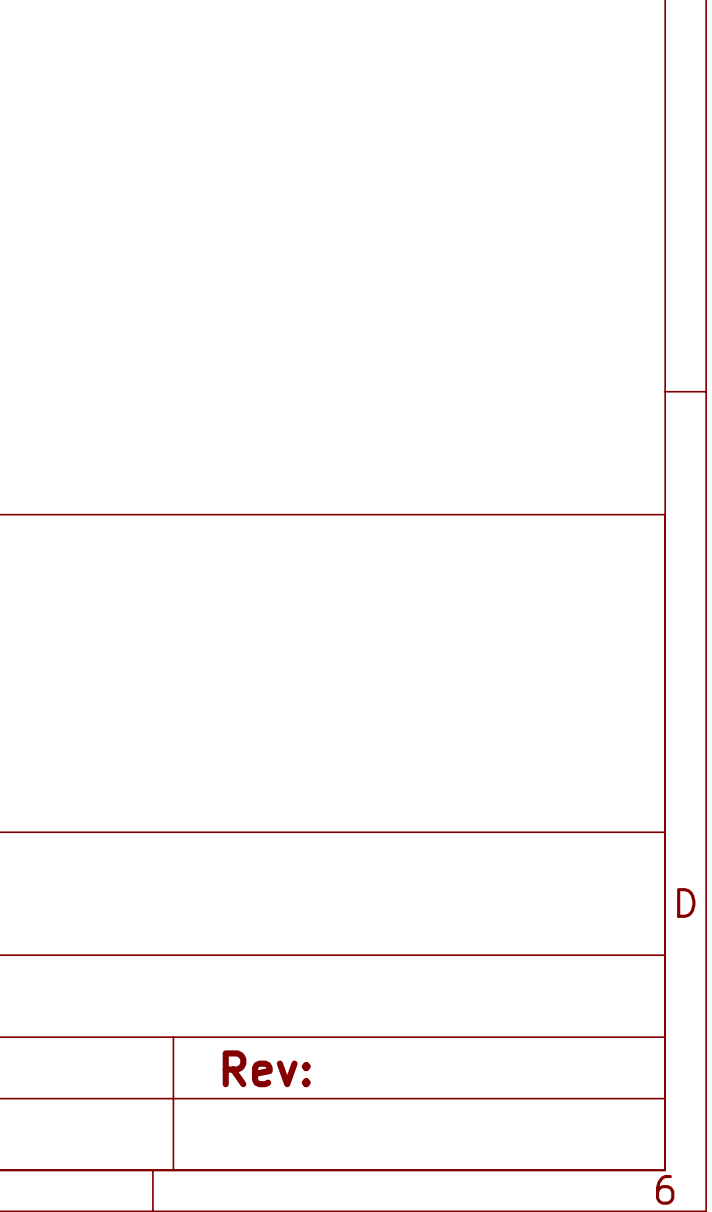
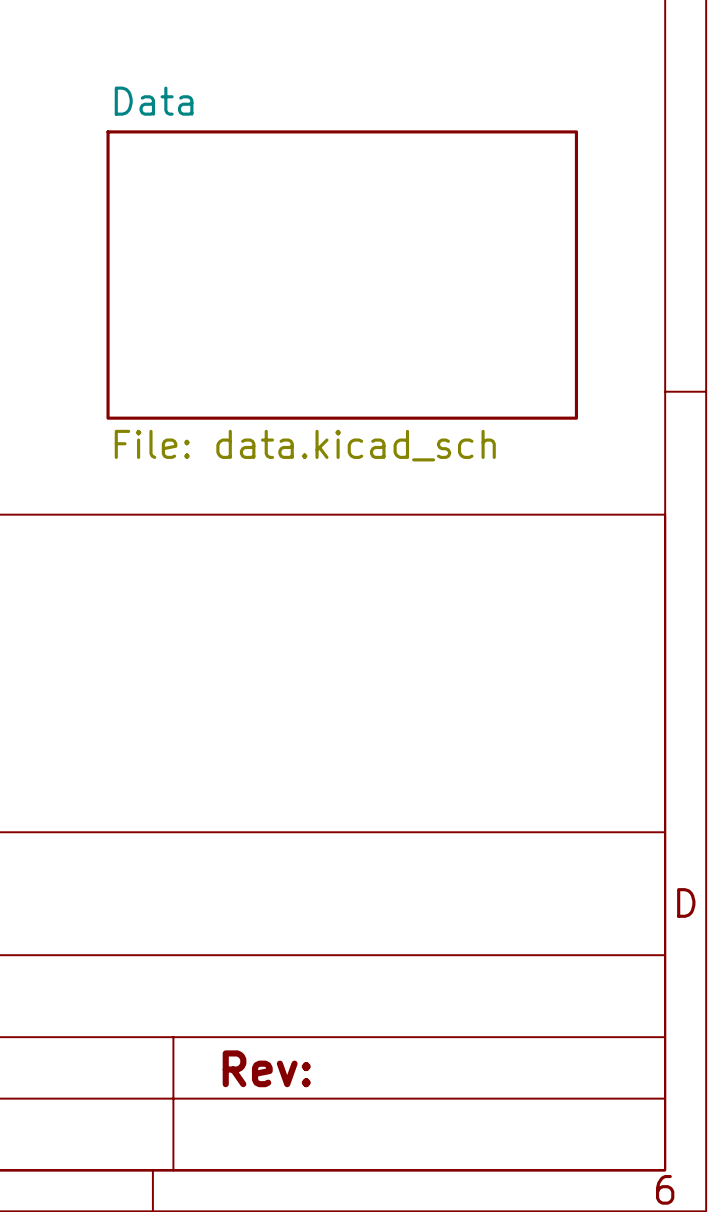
sheet Data: none -> File: data.kicad_sch (342, 275)

